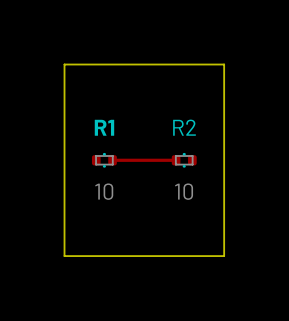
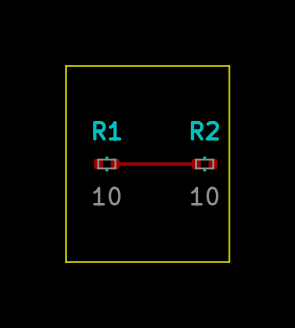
top track: none -> (180, 164) (196, 164)
R2 position: (184, 160) -> (204, 164)

